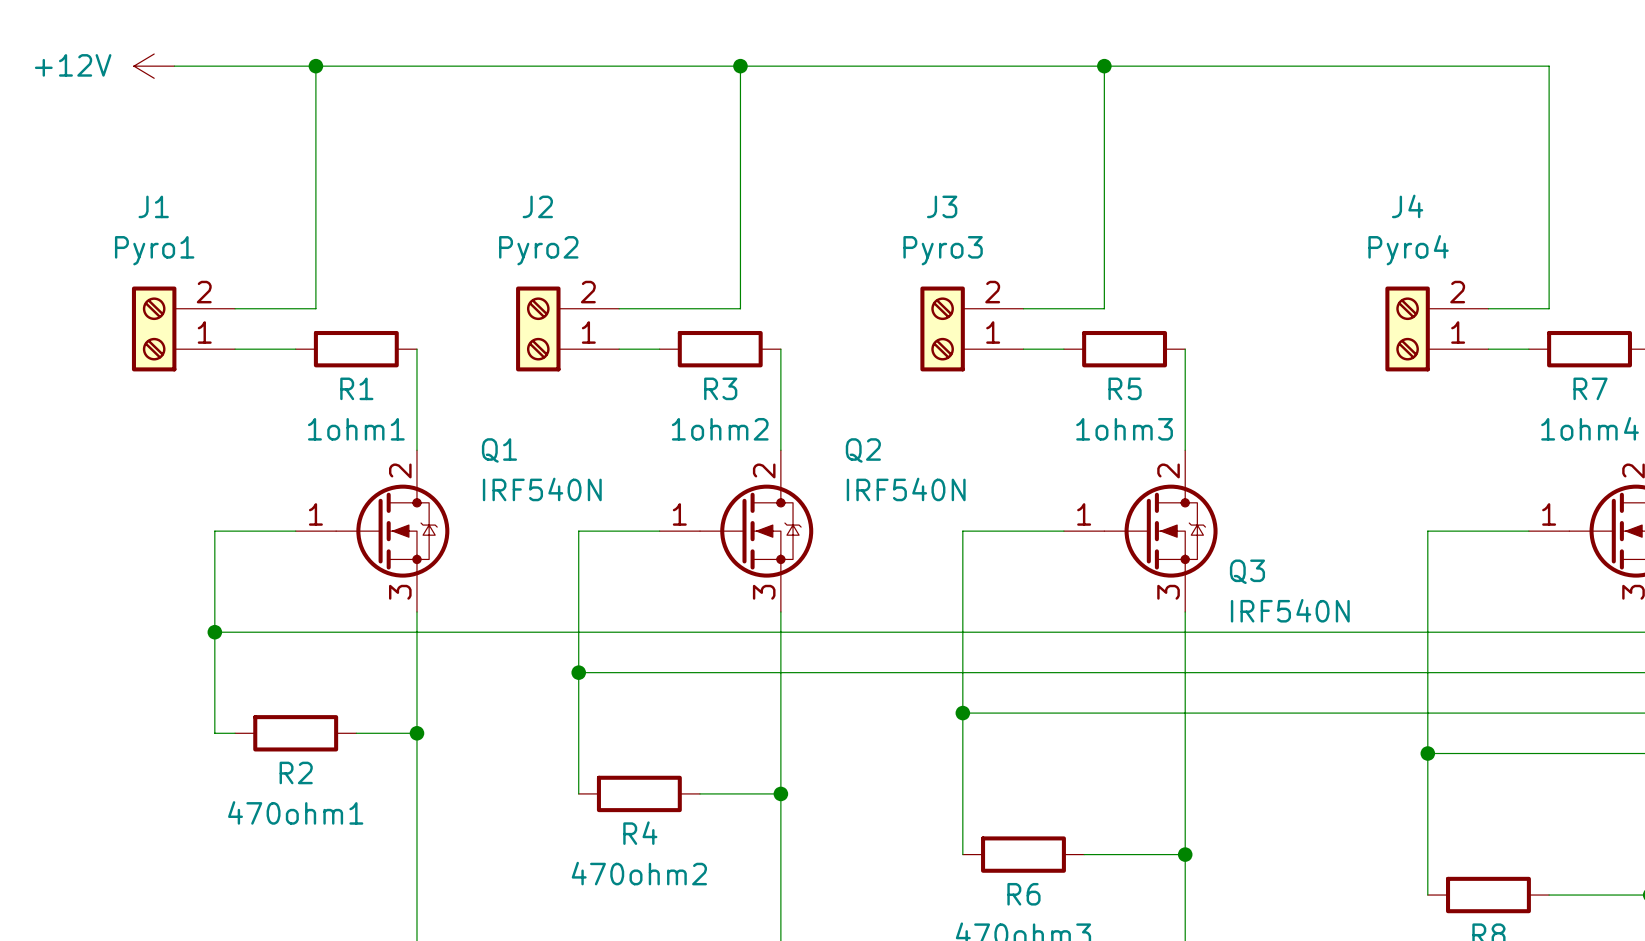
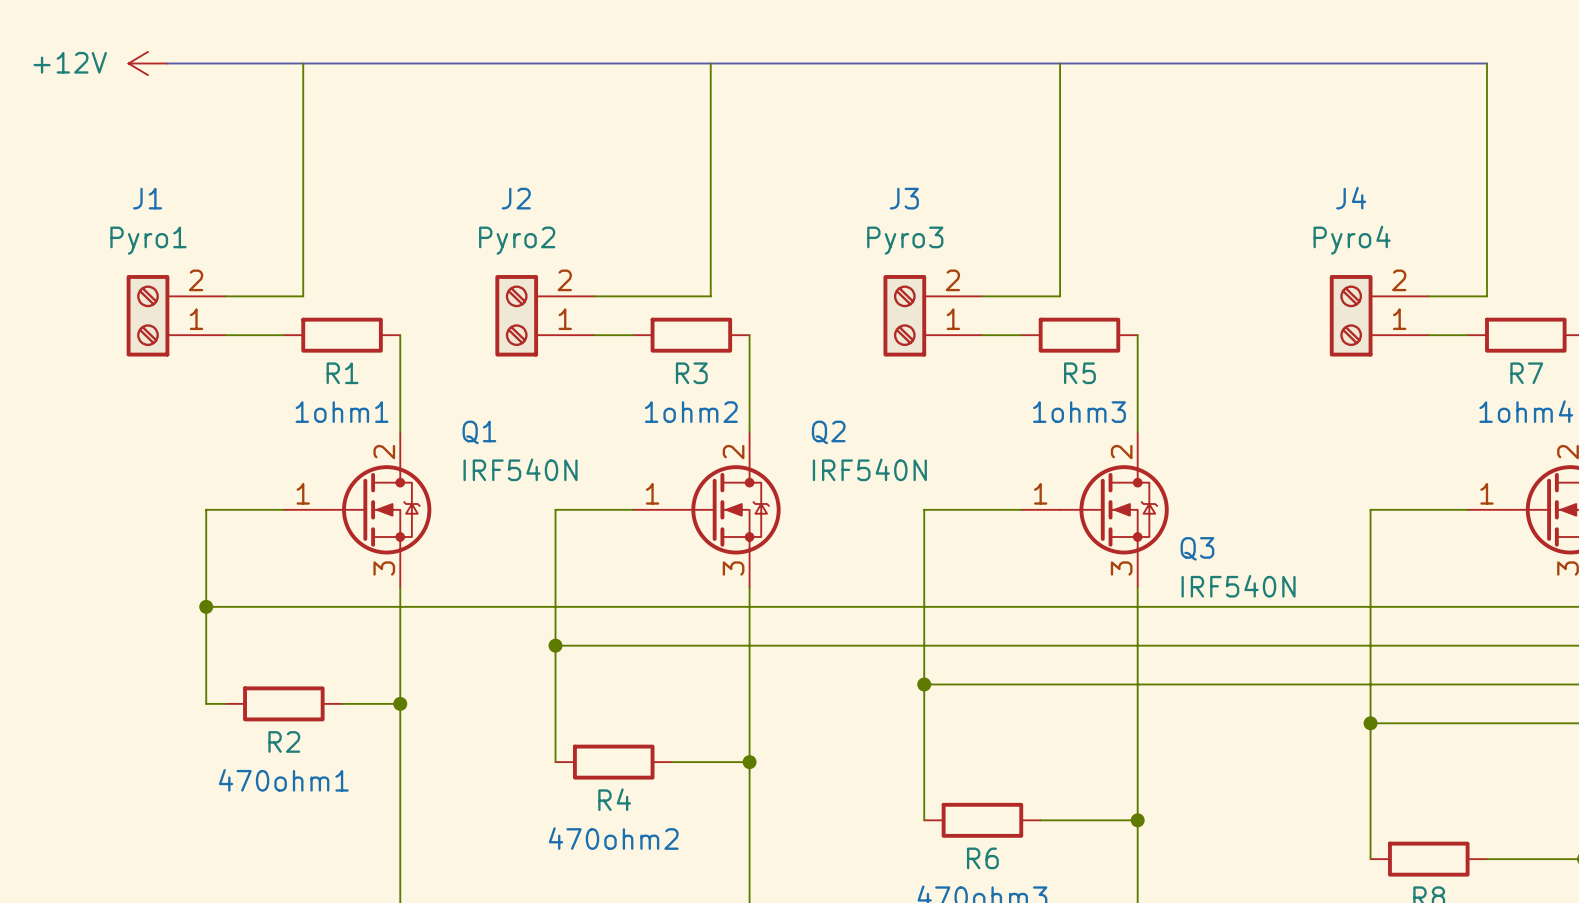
bus: none -> (167, 63) (1486, 63)
junction: (315, 66) -> none
junction: (740, 66) -> none
junction: (1104, 66) -> none

